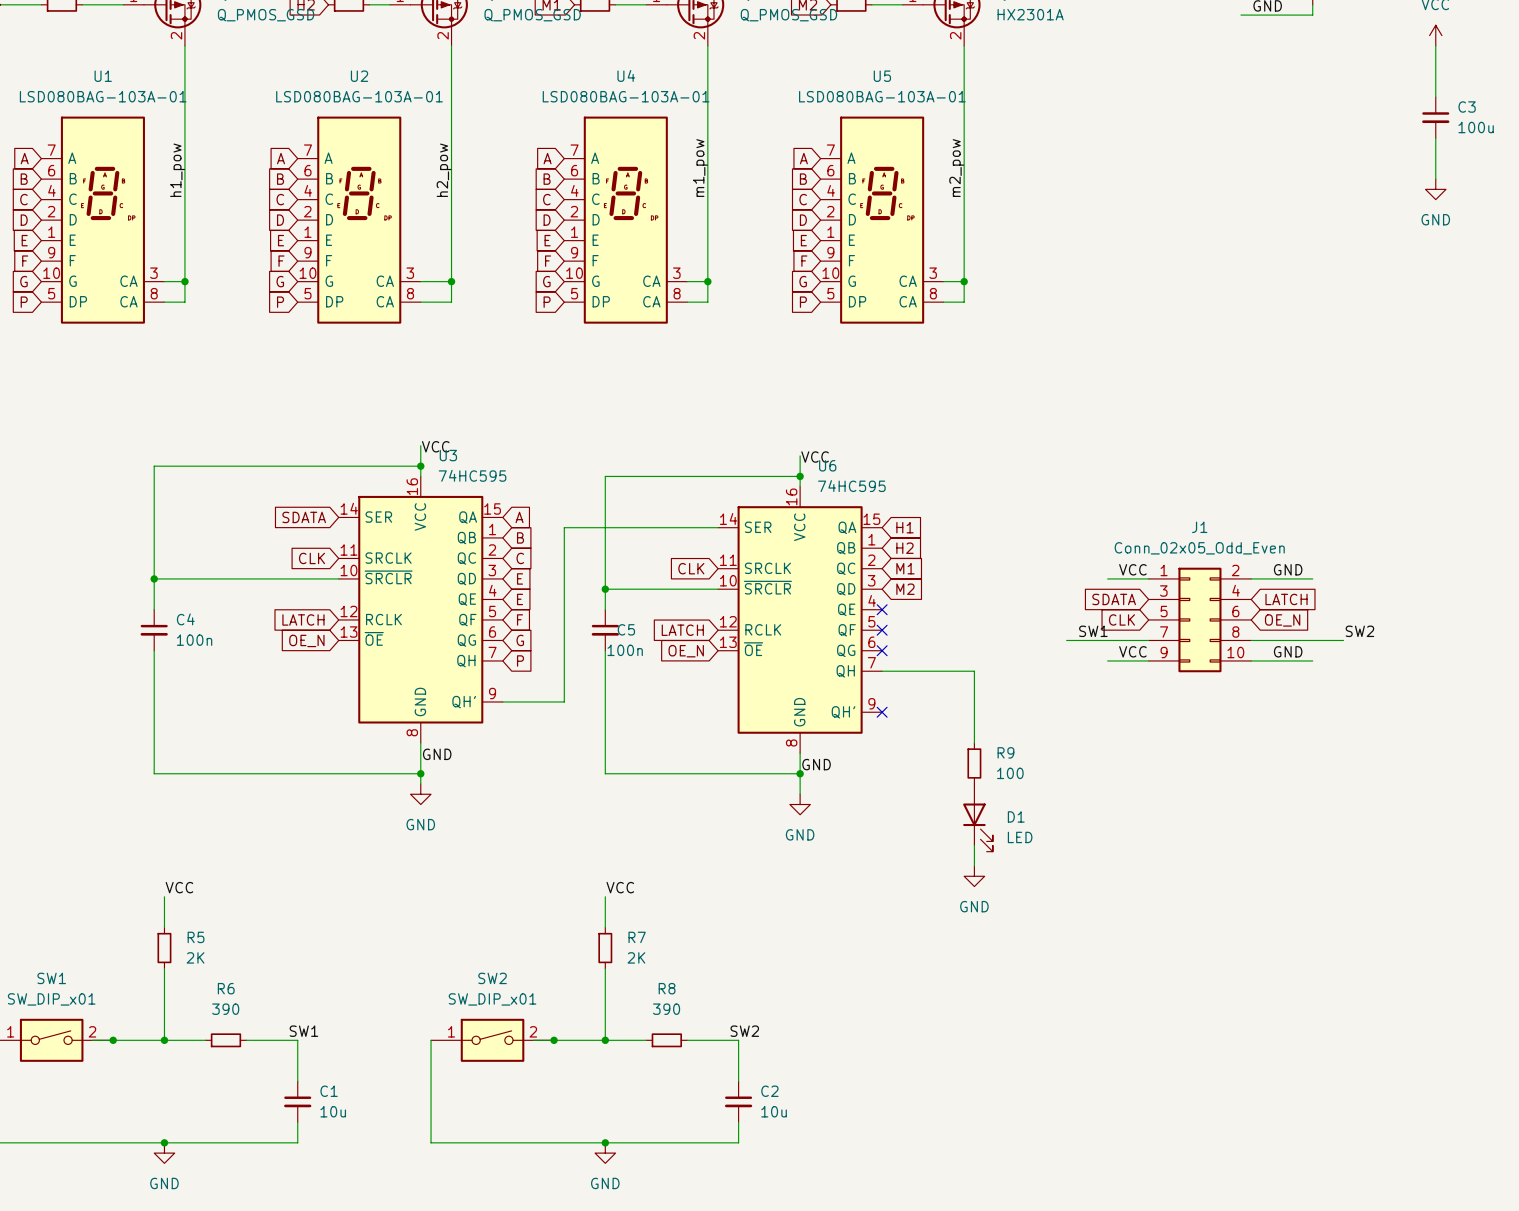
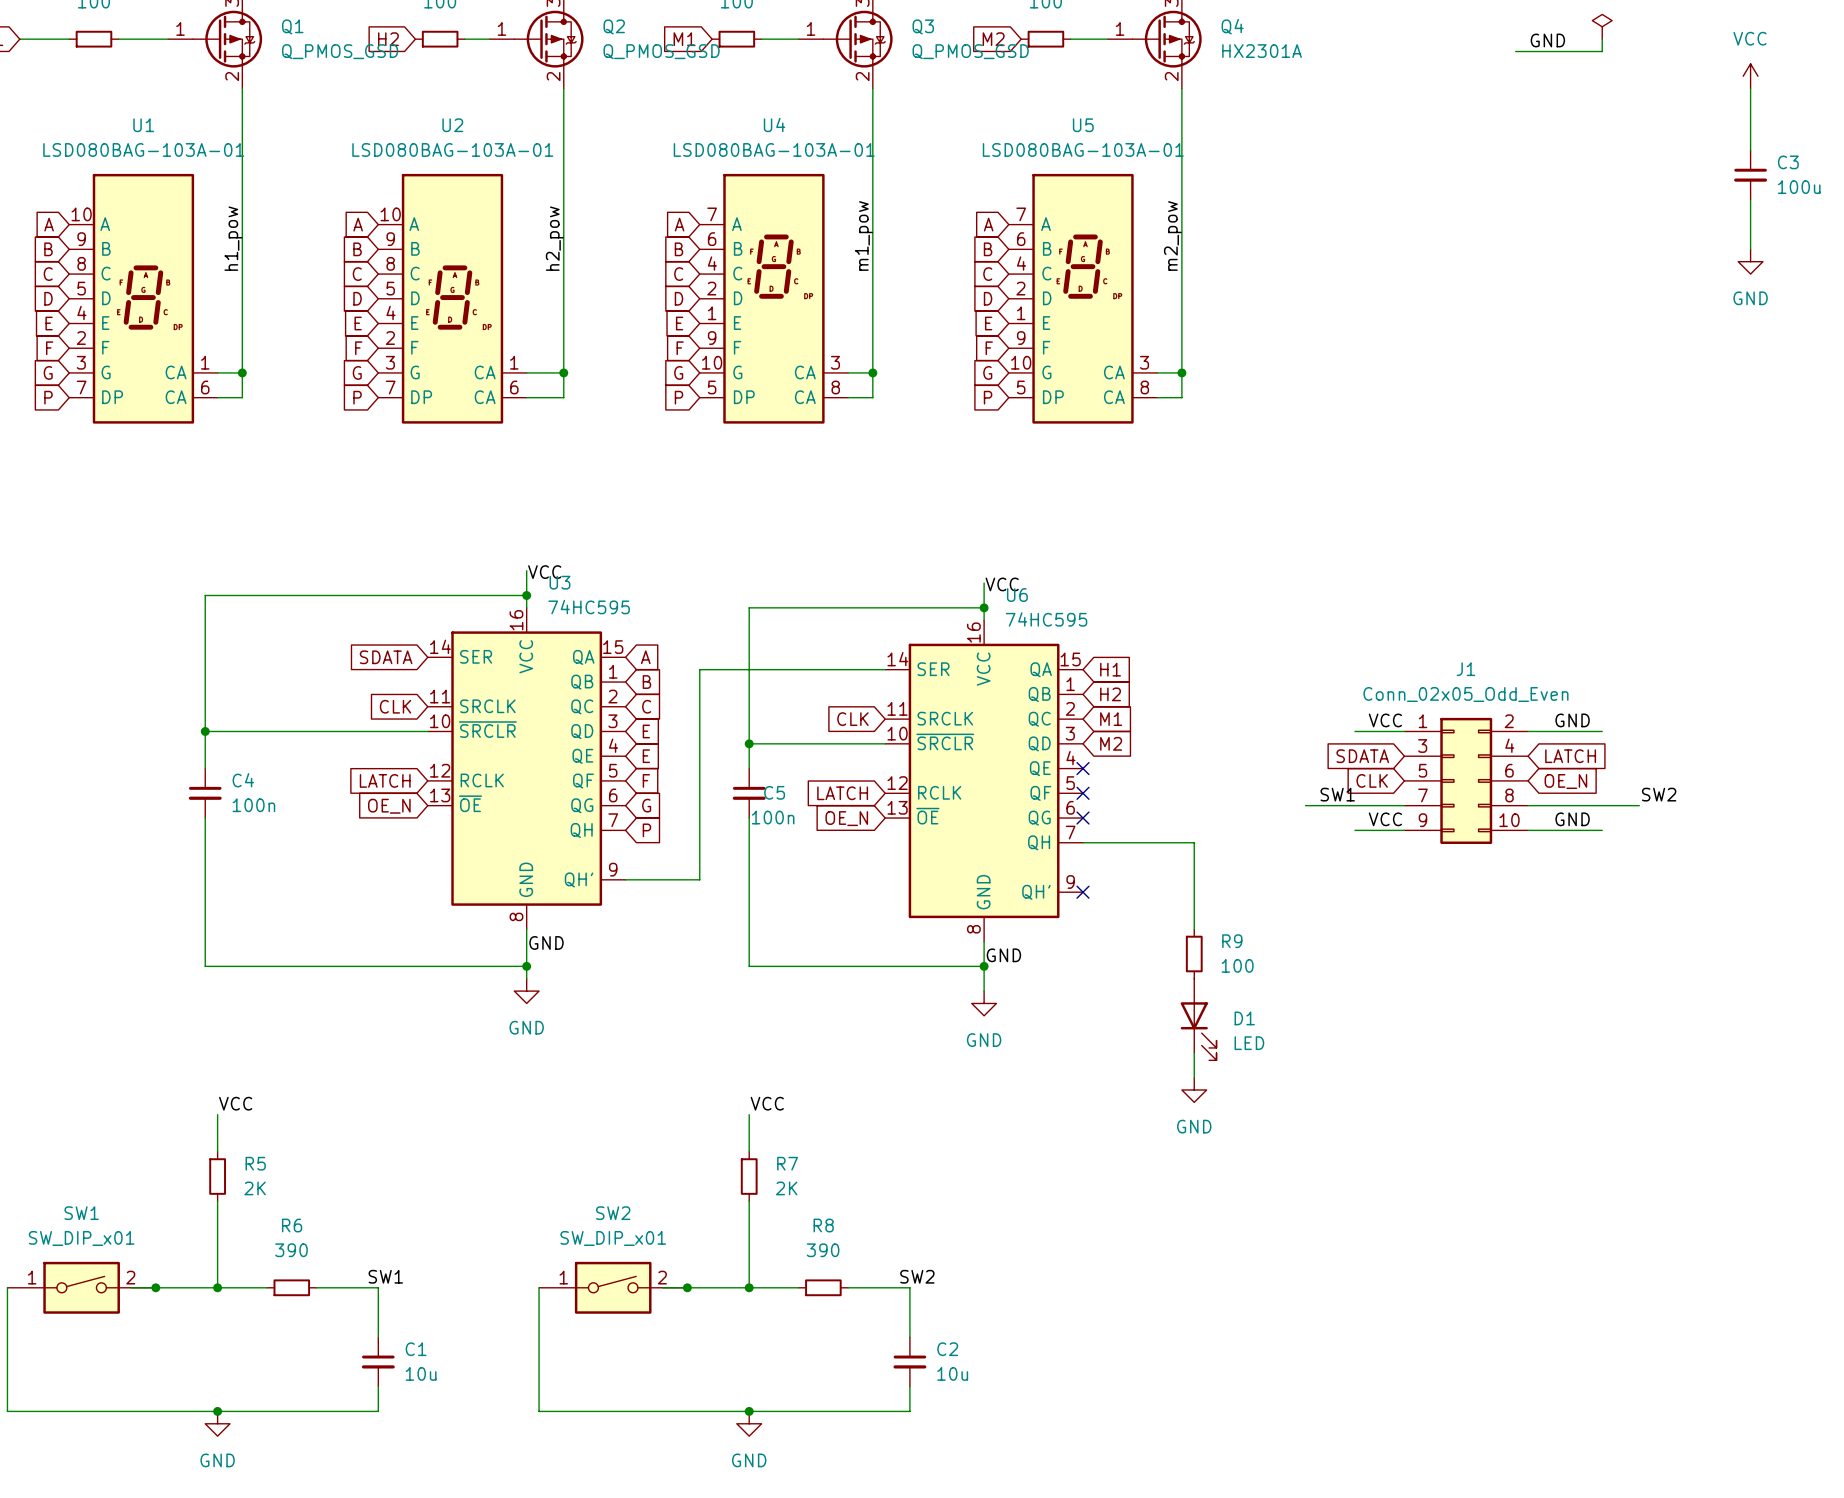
U1 symbol: [41, 116, 165, 324] -> [69, 173, 218, 424]
U2 symbol: [297, 116, 421, 324] -> [378, 173, 527, 424]

